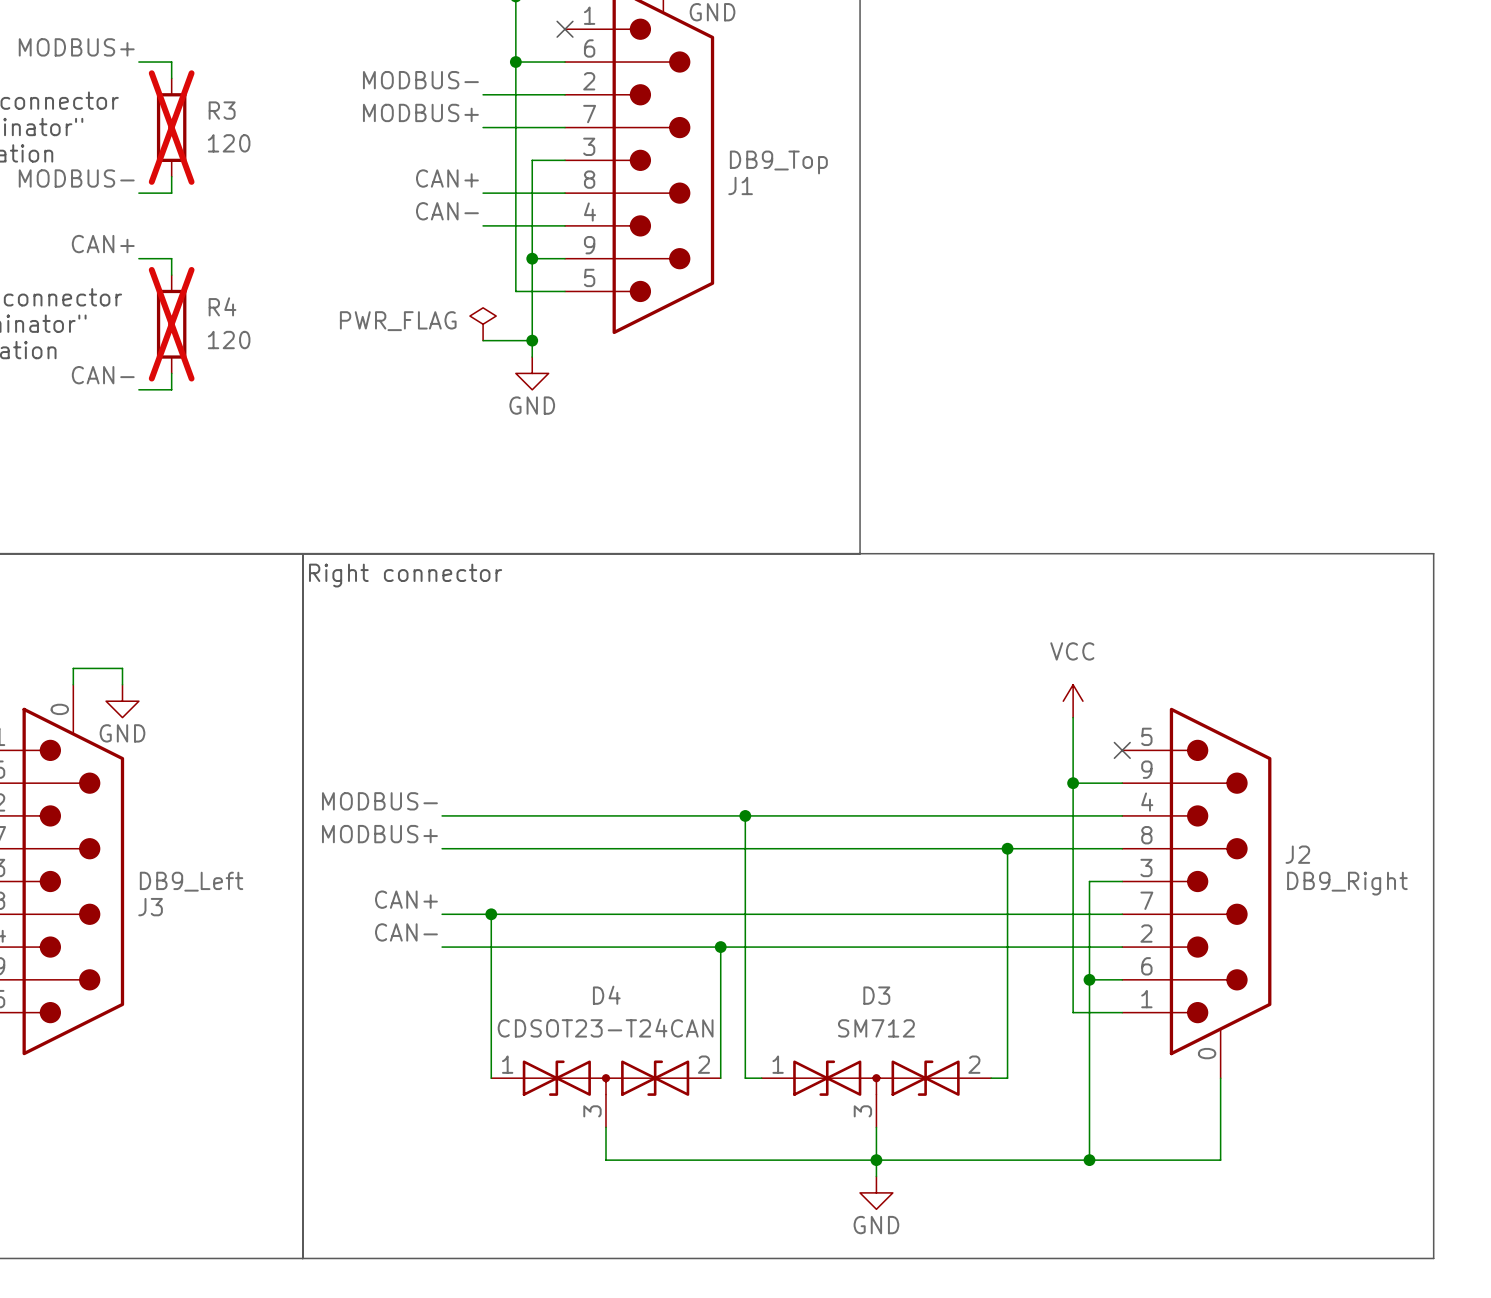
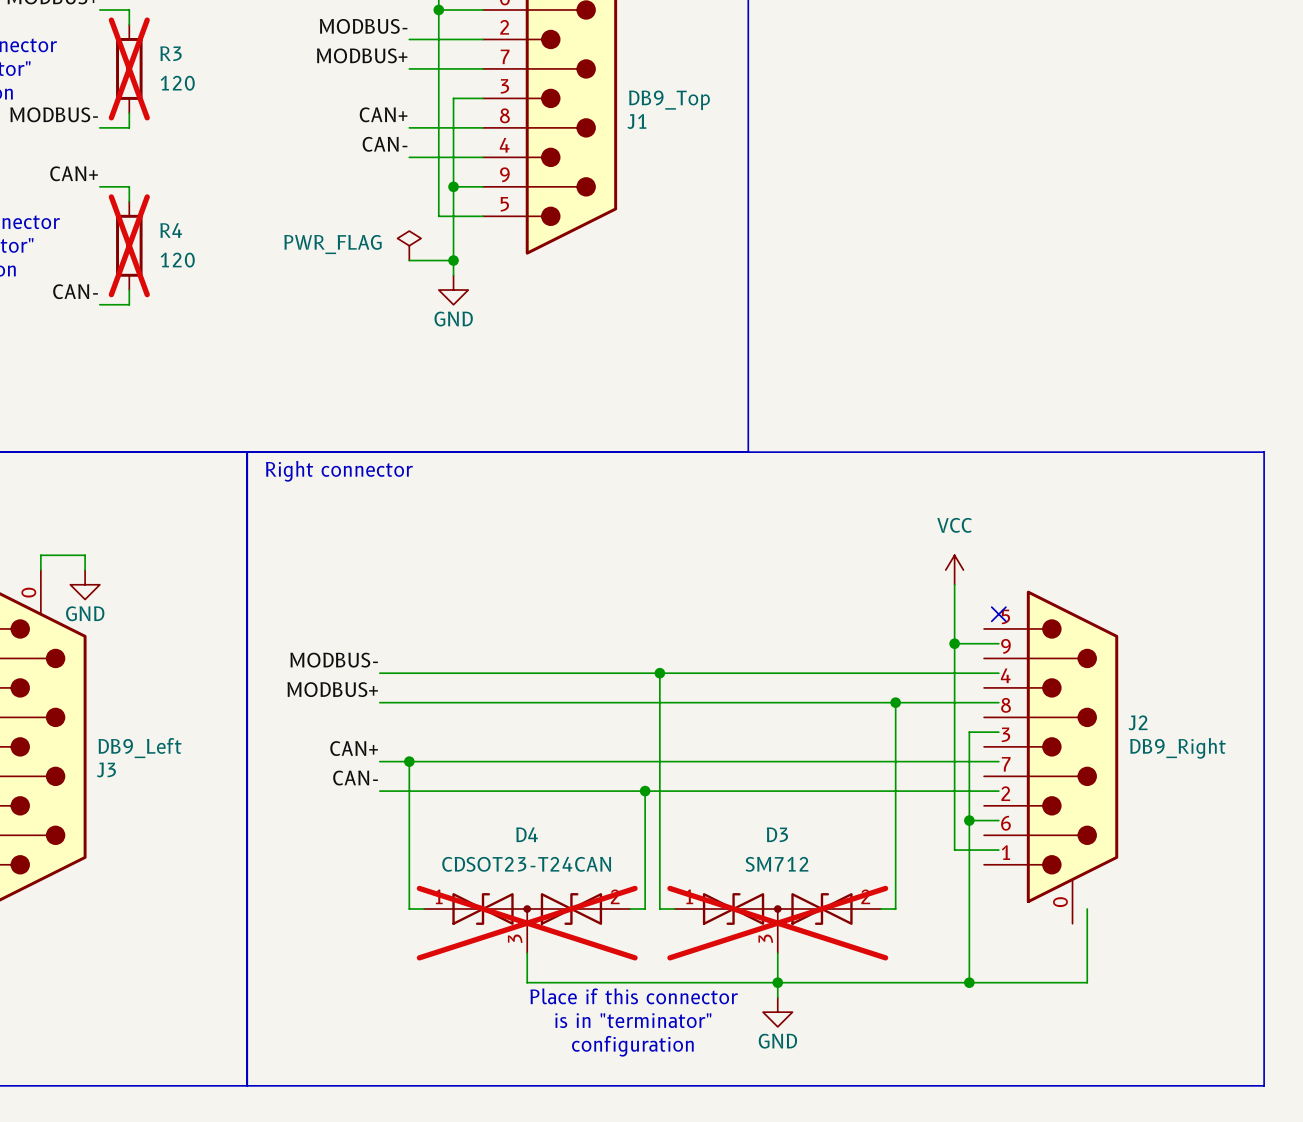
power symbol position: VCC (1073, 701) -> VCC (954, 570)
wire: (1073, 717) (1073, 1012) (1122, 1012) -> none
no-connect mark position: (1122, 750) -> (998, 614)
wire: (1073, 783) (1122, 783) -> (954, 643) (998, 643)
junction position: (1073, 783) -> (954, 643)
wire: none -> (379, 673) (998, 673)
wire: none -> (659, 673) (659, 908) (674, 908)
label position: MODBUS- (379, 801) -> MODBUS- (334, 660)
wire: (442, 815) (1122, 815) -> none
wire: (745, 815) (745, 930) -> none
junction position: (745, 815) -> (659, 673)
wire: none -> (379, 702) (998, 702)
label position: MODBUS+ (379, 834) -> MODBUS+ (332, 689)
wire: (442, 848) (1122, 848) -> none
wire: (1007, 848) (1007, 1078) (991, 1078) -> (895, 702) (895, 908) (880, 908)
junction position: (1007, 848) -> (895, 702)
wire: none -> (998, 732) (969, 732) (969, 982)
wire: (1089, 881) (1122, 881) -> (954, 746) (954, 584)
wire: none -> (379, 761) (998, 761)
wire: none -> (409, 761) (409, 908) (424, 908)
label position: CAN+ (406, 899) -> CAN+ (354, 748)
wire: (442, 914) (1122, 914) -> none
wire: (491, 914) (491, 1078) -> none
junction position: (491, 914) -> (409, 761)
wire: none -> (379, 791) (998, 791)
label position: CAN- (406, 932) -> CAN- (355, 778)
wire: (442, 947) (1122, 947) -> none
wire: (720, 947) (720, 1078) -> none
junction position: (720, 947) -> (645, 791)
wire: (1089, 979) (1122, 979) -> (969, 820) (998, 820)
junction position: (1089, 979) -> (969, 820)
wire: (1089, 996) (1089, 1160) -> (954, 850) (998, 850)
wire: (745, 1061) (745, 1078) (761, 1078) -> (645, 908) (630, 908)
wire: none -> (1087, 908) (1087, 982) (527, 982) (527, 953)
D4 do-not-place cross: none -> (527, 923)
D3 do-not-place cross: none -> (777, 923)
wire: (1220, 1078) (1220, 1160) (605, 1160) (605, 1127) -> none
D4 position: (605, 1093) -> (527, 923)
D3 position: (876, 1093) -> (777, 923)
wire: (876, 1127) (876, 1176) -> (777, 953) (777, 997)
text: none -> Place if this connector (634, 996)
junction position: (876, 1160) -> (777, 982)
junction position: (1089, 1160) -> (969, 982)
text: none -> is in "terminator" (633, 1020)
power symbol position: GND (876, 1192) -> GND (777, 1012)
text: none -> configuration (632, 1046)

